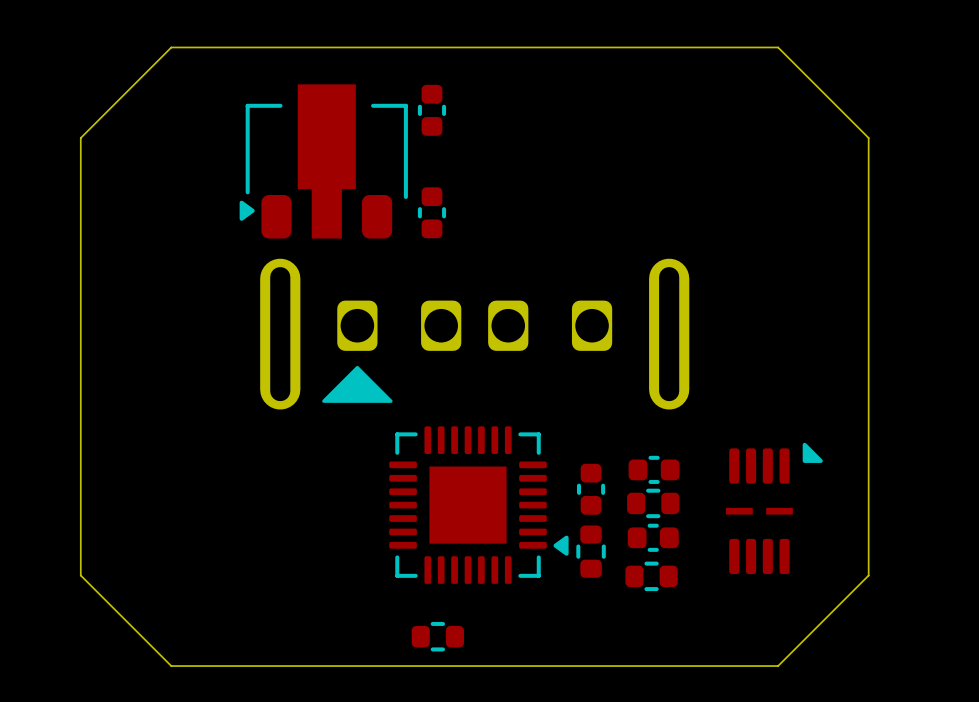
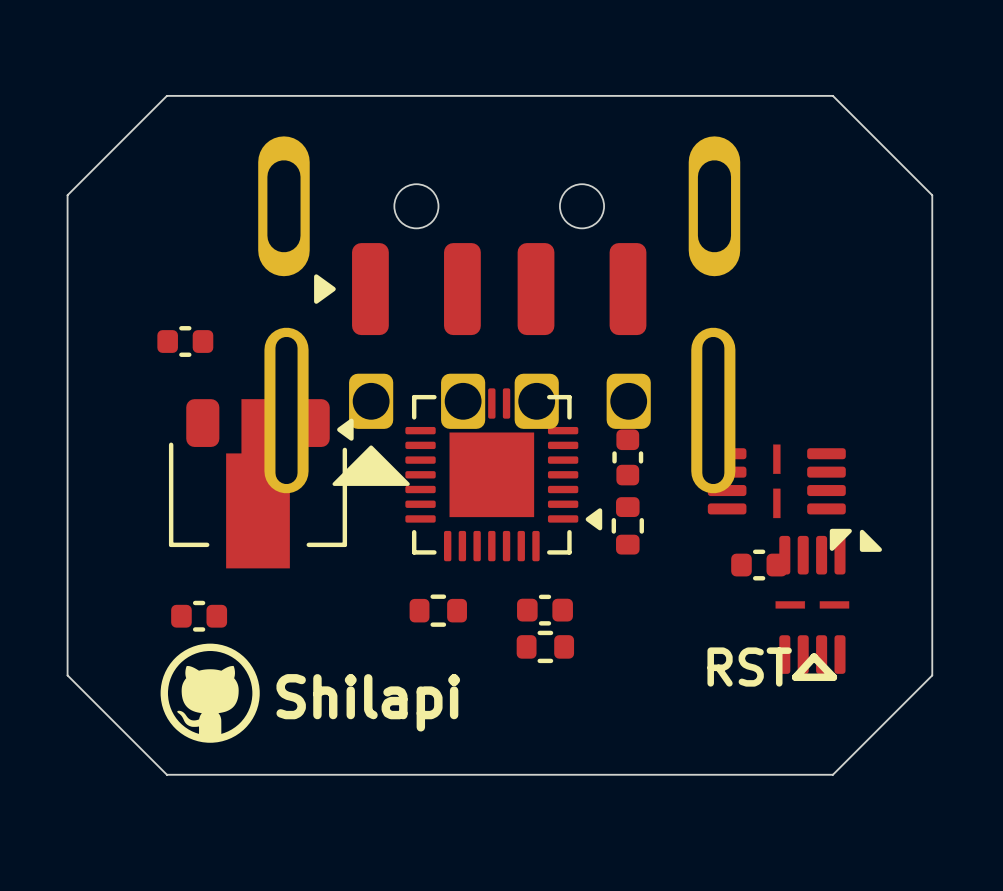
part: (431, 110) -> none
part rotation: 0° (323, 161) -> 180° (261, 483)
part position: (323, 161) -> (261, 483)
part: none -> (499, 235)
part: (431, 212) -> none
part: none -> (185, 341)
part: none -> (627, 457)
part: none -> (779, 497)
part: none -> (627, 525)
part: (654, 469) -> none
part: none -> (759, 565)
part: (591, 489) -> none
part: (653, 503) -> none
part position: (478, 505) -> (503, 474)
part: none -> (438, 610)
part: none -> (544, 610)
part: none -> (199, 616)
part: (653, 537) -> none
drawing: none -> [160, 643, 260, 743]
part: none -> (545, 646)
part: (591, 551) -> none
line: none -> (814, 657) (795, 677) (833, 677) (814, 657)
text: none -> RST (749, 667)
part: (651, 576) -> none
text: none -> Shilapi (368, 702)
part: (437, 636) -> none

